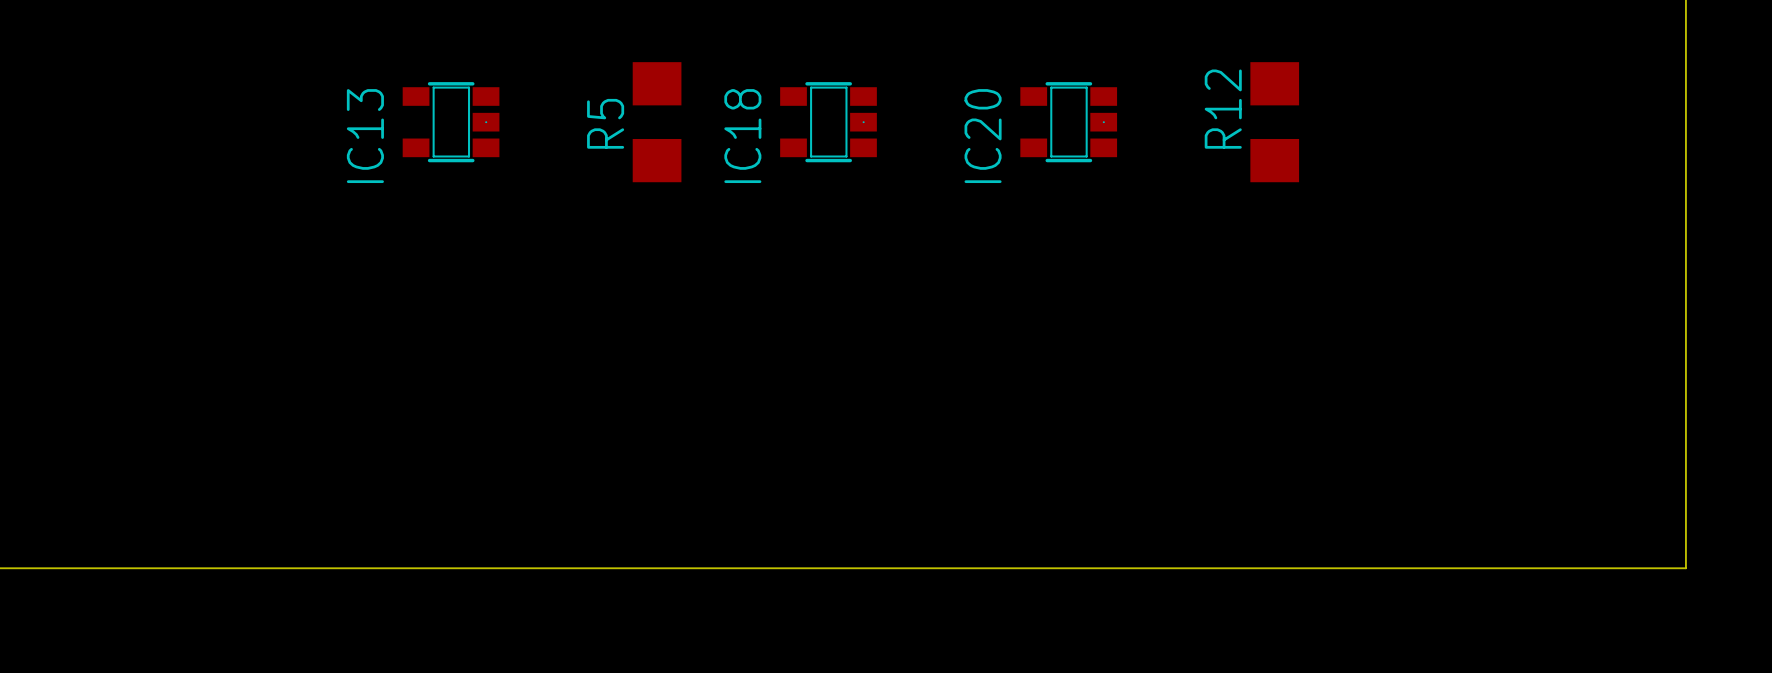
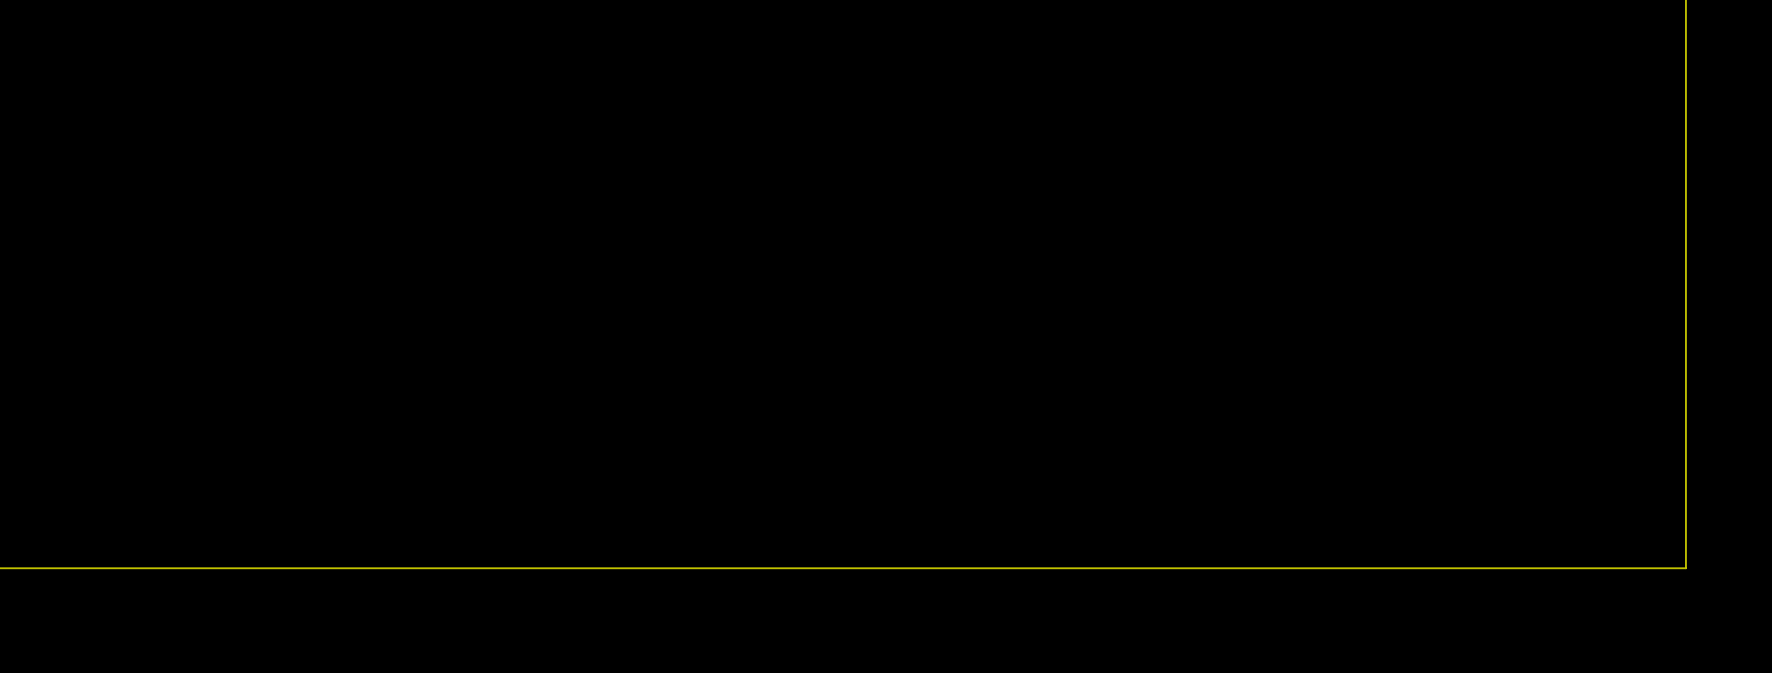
IC13: (451, 122) -> none
R5: (657, 122) -> none
IC18: (828, 122) -> none
IC20: (1068, 122) -> none
R12: (1274, 122) -> none

